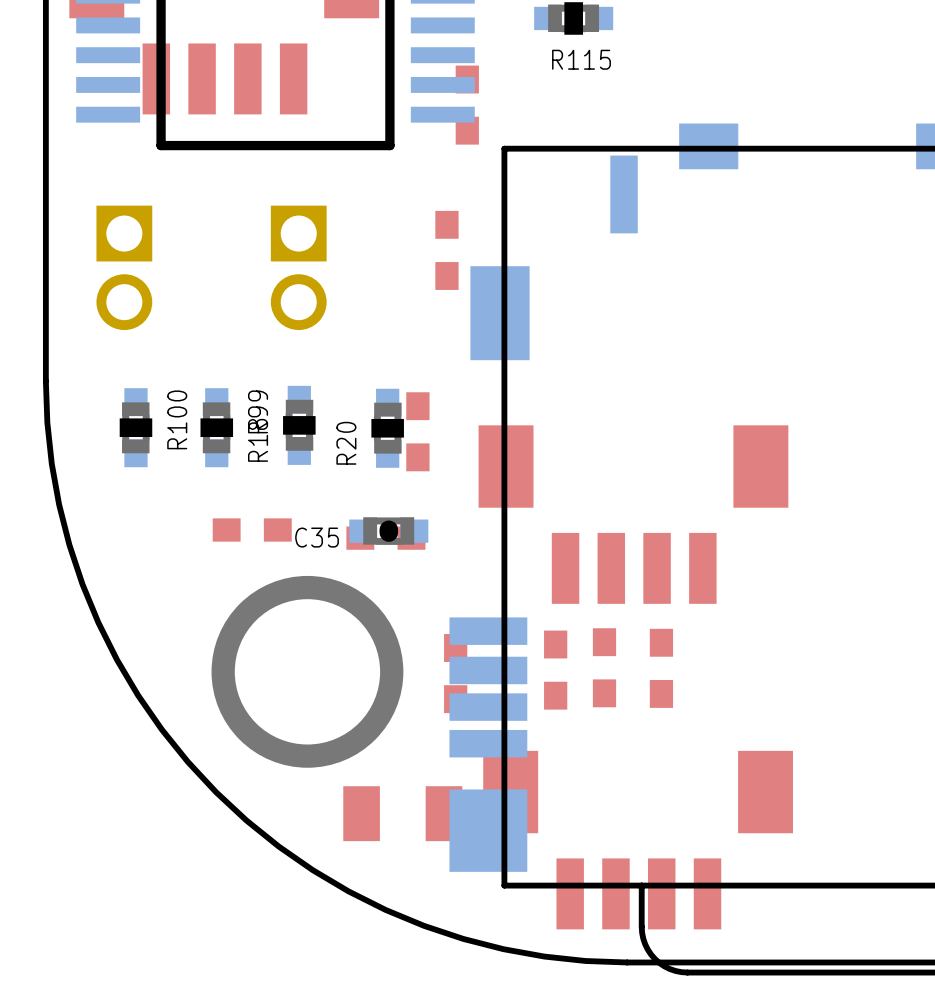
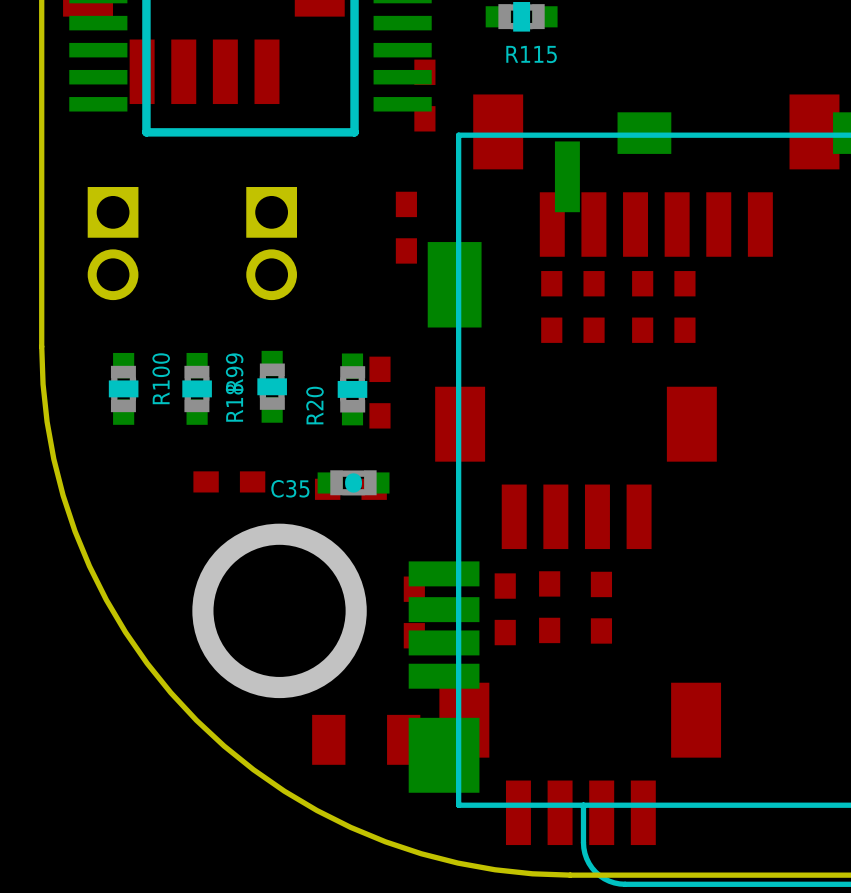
part: none -> (656, 175)
part: none -> (551, 306)
part: none -> (594, 306)
part: none -> (642, 306)
part: none -> (684, 306)

